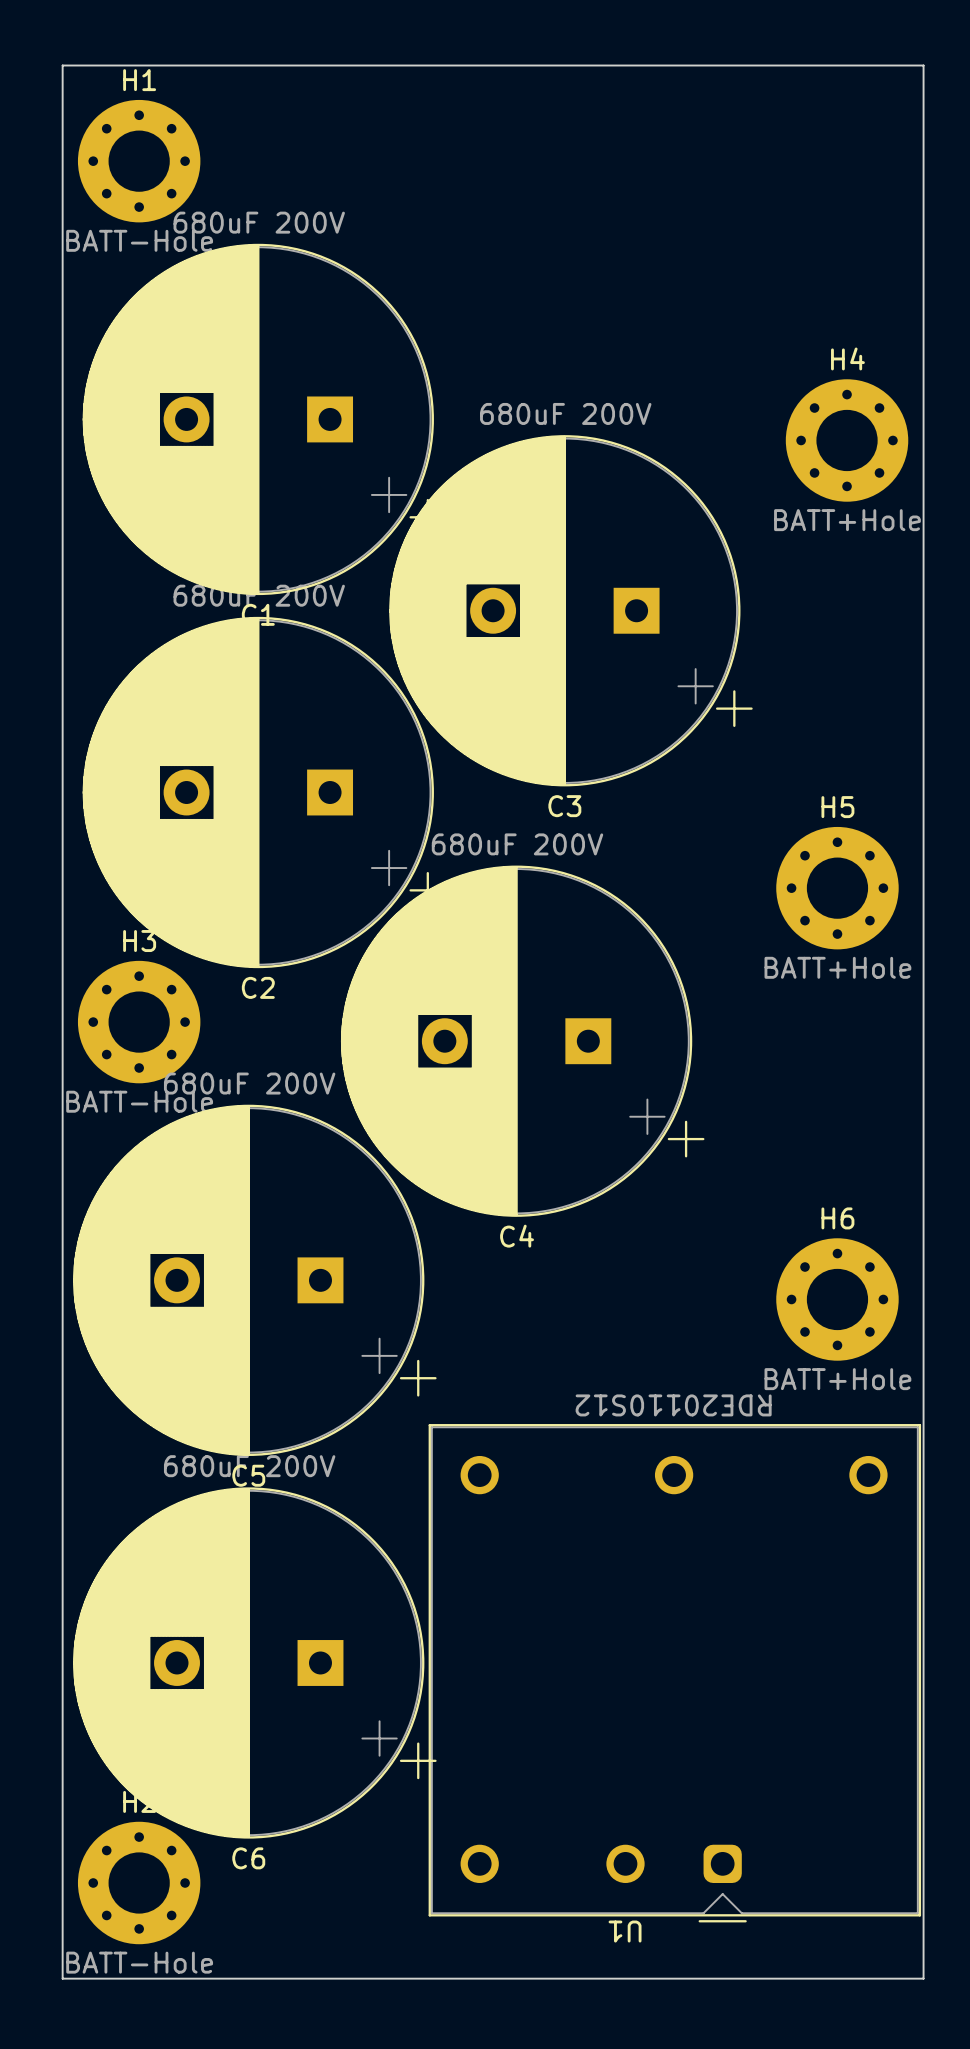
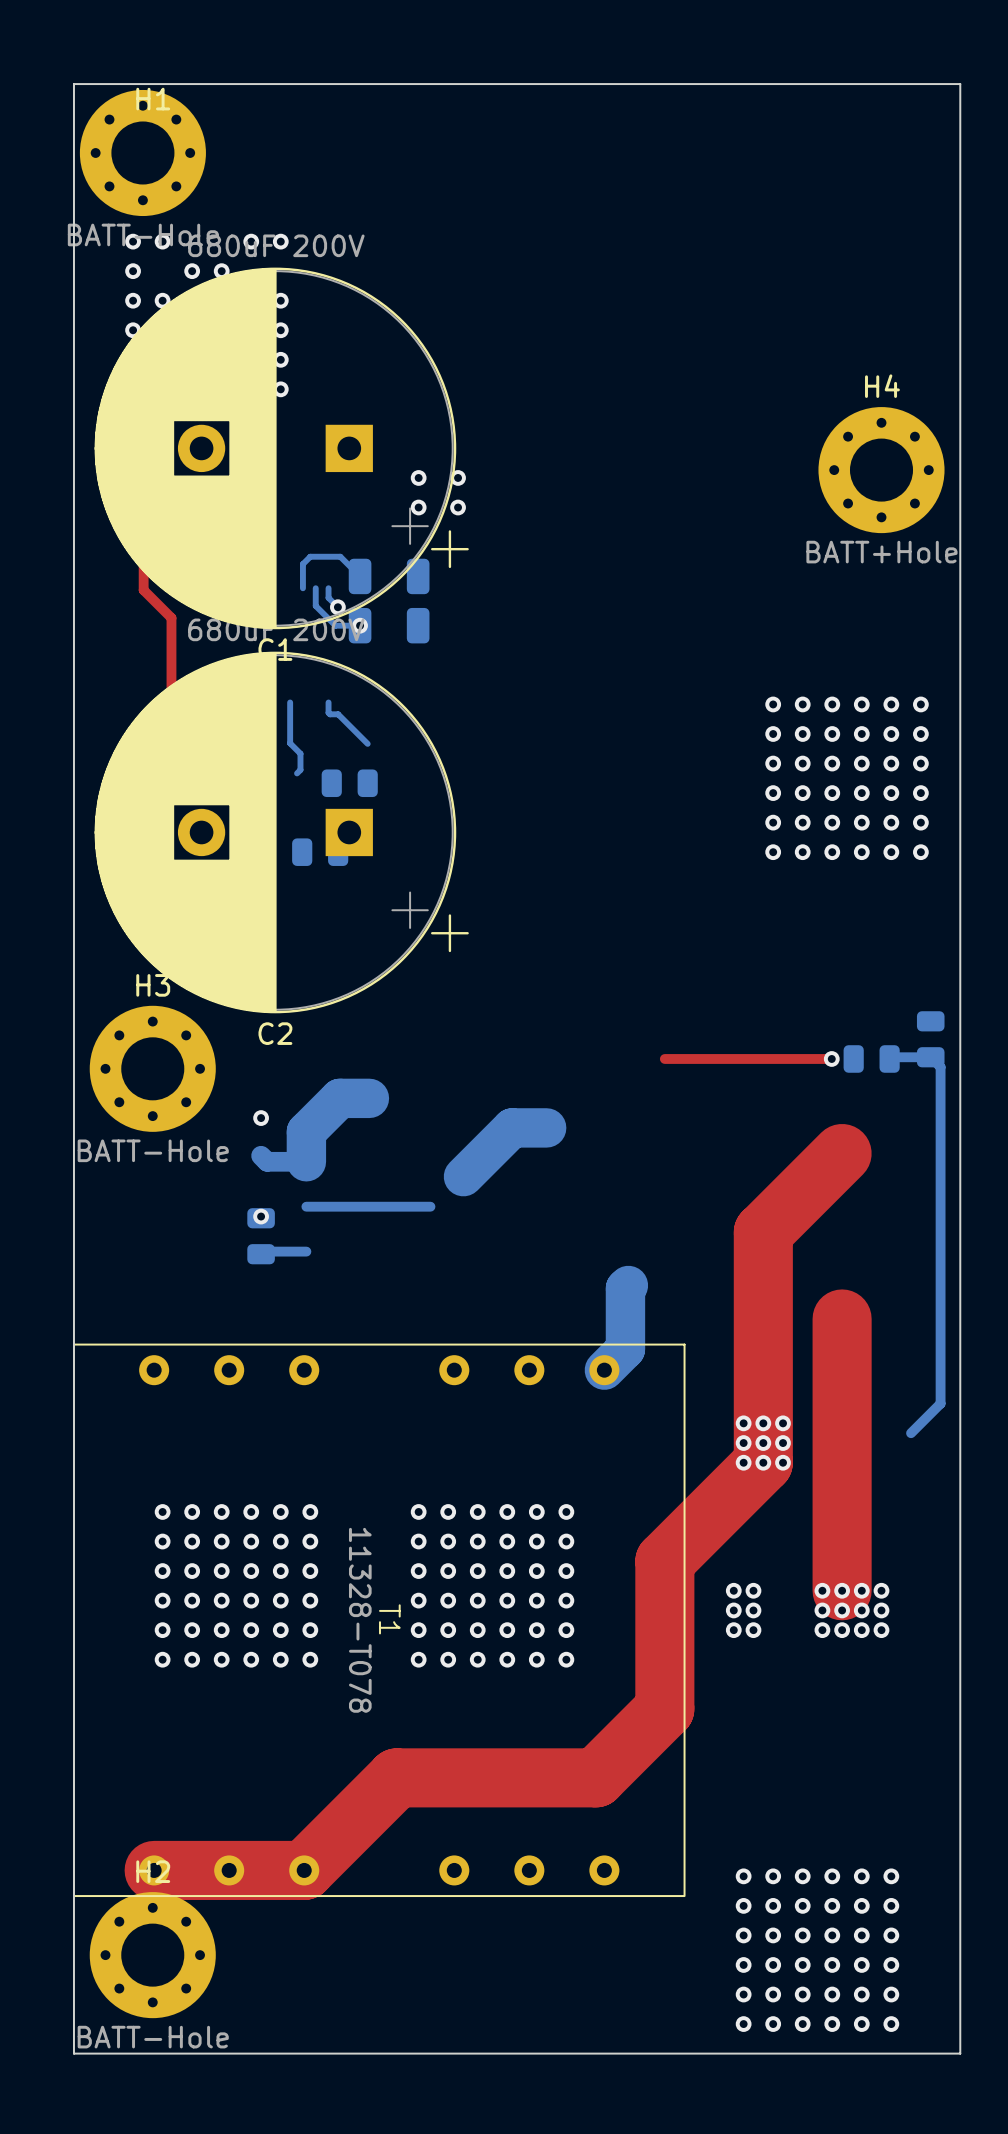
H1 position: (139, 161) -> (142, 152)
via: none -> (133, 241)
via: none -> (162, 241)
via: none -> (251, 241)
via: none -> (280, 241)
via: none -> (133, 271)
via: none -> (192, 271)
via: none -> (221, 271)
via: none -> (133, 300)
via: none -> (162, 300)
via: none -> (280, 300)
via: none -> (133, 330)
via: none -> (280, 330)
via: none -> (280, 359)
via: none -> (280, 389)
via: none -> (418, 477)
via: none -> (458, 477)
top track: none -> (143, 487) (143, 590) (171, 618) (171, 705) (143, 734)
via: none -> (418, 507)
via: none -> (458, 507)
bottom track: none -> (360, 576) (340, 556) (310, 556) (302, 564) (302, 588)
part: none -> (389, 576)
bottom track: none -> (315, 588) (315, 605) (335, 625) (360, 625)
bottom track: none -> (328, 588) (328, 597) (337, 607)
via: none -> (337, 607)
via: none -> (360, 625)
part: none -> (389, 625)
C3: 680uF 200V (570, 610) -> none
bottom track: none -> (290, 702) (290, 743) (300, 753) (300, 769) (297, 773)
bottom track: none -> (328, 702) (328, 712) (338, 714) (367, 743)
via: none -> (773, 704)
via: none -> (802, 704)
via: none -> (832, 704)
via: none -> (861, 704)
via: none -> (891, 704)
via: none -> (920, 704)
via: none -> (773, 734)
via: none -> (802, 734)
via: none -> (832, 734)
via: none -> (861, 734)
via: none -> (891, 734)
via: none -> (920, 734)
via: none -> (773, 763)
via: none -> (802, 763)
via: none -> (832, 763)
via: none -> (861, 763)
via: none -> (891, 763)
via: none -> (920, 763)
part: none -> (349, 783)
via: none -> (773, 793)
via: none -> (802, 793)
via: none -> (832, 793)
via: none -> (861, 793)
via: none -> (891, 793)
via: none -> (920, 793)
via: none -> (773, 822)
via: none -> (802, 822)
via: none -> (832, 822)
via: none -> (861, 822)
via: none -> (891, 822)
via: none -> (920, 822)
part: none -> (320, 852)
via: none -> (773, 852)
via: none -> (802, 852)
via: none -> (832, 852)
via: none -> (861, 852)
via: none -> (891, 852)
via: none -> (920, 852)
H5: BATT+Hole (837, 888) -> none
part: none -> (930, 1039)
top track: none -> (664, 1058) (831, 1058)
via: none -> (831, 1058)
part: none -> (871, 1058)
bottom track: none -> (889, 1058) (891, 1057) (930, 1057) (940, 1067) (940, 1403) (911, 1433)
C4: 680uF 200V (522, 1041) -> none
bottom track: none -> (369, 1098) (339, 1098) (306, 1131) (306, 1161) (267, 1161) (261, 1155)
via: none -> (261, 1118)
bottom track: none -> (546, 1127) (512, 1127) (463, 1177)
top track: none -> (842, 1153) (763, 1232) (763, 1462) (664, 1561) (664, 1708) (595, 1777) (396, 1777) (304, 1870) (154, 1870)
bottom track: none -> (306, 1206) (430, 1206)
via: none -> (261, 1216)
part: none -> (261, 1236)
bottom track: none -> (306, 1251) (263, 1251) (259, 1255)
bottom track: none -> (628, 1285) (625, 1288) (625, 1349) (604, 1370)
top track: none -> (842, 1318) (842, 1590)
C5: 680uF 200V (254, 1280) -> none
H6: BATT+Hole (837, 1299) -> none
via: none -> (743, 1423)
via: none -> (763, 1423)
via: none -> (783, 1423)
via: none -> (743, 1443)
via: none -> (763, 1443)
via: none -> (783, 1443)
via: none -> (743, 1462)
via: none -> (763, 1462)
via: none -> (783, 1462)
via: none -> (162, 1511)
via: none -> (192, 1511)
via: none -> (221, 1511)
via: none -> (251, 1511)
via: none -> (280, 1511)
via: none -> (310, 1511)
via: none -> (418, 1511)
via: none -> (448, 1511)
via: none -> (477, 1511)
via: none -> (507, 1511)
via: none -> (536, 1511)
via: none -> (566, 1511)
via: none -> (162, 1541)
via: none -> (192, 1541)
via: none -> (221, 1541)
via: none -> (251, 1541)
via: none -> (280, 1541)
via: none -> (310, 1541)
via: none -> (418, 1541)
via: none -> (448, 1541)
via: none -> (477, 1541)
via: none -> (507, 1541)
via: none -> (536, 1541)
via: none -> (566, 1541)
via: none -> (162, 1571)
via: none -> (192, 1571)
via: none -> (221, 1571)
via: none -> (251, 1571)
via: none -> (280, 1571)
via: none -> (310, 1571)
via: none -> (418, 1571)
via: none -> (448, 1571)
via: none -> (477, 1571)
via: none -> (507, 1571)
via: none -> (536, 1571)
via: none -> (566, 1571)
via: none -> (733, 1590)
via: none -> (753, 1590)
via: none -> (822, 1590)
via: none -> (842, 1590)
via: none -> (861, 1590)
via: none -> (881, 1590)
via: none -> (162, 1600)
via: none -> (192, 1600)
via: none -> (221, 1600)
via: none -> (251, 1600)
via: none -> (280, 1600)
via: none -> (310, 1600)
via: none -> (418, 1600)
via: none -> (448, 1600)
via: none -> (477, 1600)
via: none -> (507, 1600)
via: none -> (536, 1600)
via: none -> (566, 1600)
via: none -> (733, 1610)
via: none -> (753, 1610)
via: none -> (822, 1610)
via: none -> (842, 1610)
via: none -> (861, 1610)
via: none -> (881, 1610)
T1: none -> 11328-T078 (379, 1620)
via: none -> (162, 1630)
via: none -> (192, 1630)
via: none -> (221, 1630)
via: none -> (251, 1630)
via: none -> (280, 1630)
via: none -> (310, 1630)
via: none -> (418, 1630)
via: none -> (448, 1630)
via: none -> (477, 1630)
via: none -> (507, 1630)
via: none -> (536, 1630)
via: none -> (566, 1630)
via: none -> (733, 1630)
via: none -> (753, 1630)
via: none -> (822, 1630)
via: none -> (842, 1630)
via: none -> (861, 1630)
via: none -> (881, 1630)
via: none -> (162, 1659)
via: none -> (192, 1659)
via: none -> (221, 1659)
via: none -> (251, 1659)
via: none -> (280, 1659)
via: none -> (310, 1659)
via: none -> (418, 1659)
via: none -> (448, 1659)
via: none -> (477, 1659)
via: none -> (507, 1659)
via: none -> (536, 1659)
via: none -> (566, 1659)
C6: 680uF 200V (254, 1662) -> none
U1: RDE20110S12 (674, 1673) -> none
via: none -> (743, 1876)
via: none -> (773, 1876)
via: none -> (802, 1876)
via: none -> (832, 1876)
via: none -> (861, 1876)
via: none -> (891, 1876)
via: none -> (743, 1905)
via: none -> (773, 1905)
via: none -> (802, 1905)
via: none -> (832, 1905)
via: none -> (861, 1905)
via: none -> (891, 1905)
via: none -> (743, 1935)
via: none -> (773, 1935)
via: none -> (802, 1935)
via: none -> (832, 1935)
via: none -> (861, 1935)
via: none -> (891, 1935)
via: none -> (743, 1964)
via: none -> (773, 1964)
via: none -> (802, 1964)
via: none -> (832, 1964)
via: none -> (861, 1964)
via: none -> (891, 1964)
via: none -> (743, 1994)
via: none -> (773, 1994)
via: none -> (802, 1994)
via: none -> (832, 1994)
via: none -> (861, 1994)
via: none -> (891, 1994)
via: none -> (743, 2024)
via: none -> (773, 2024)
via: none -> (802, 2024)
via: none -> (832, 2024)
via: none -> (861, 2024)
via: none -> (891, 2024)

